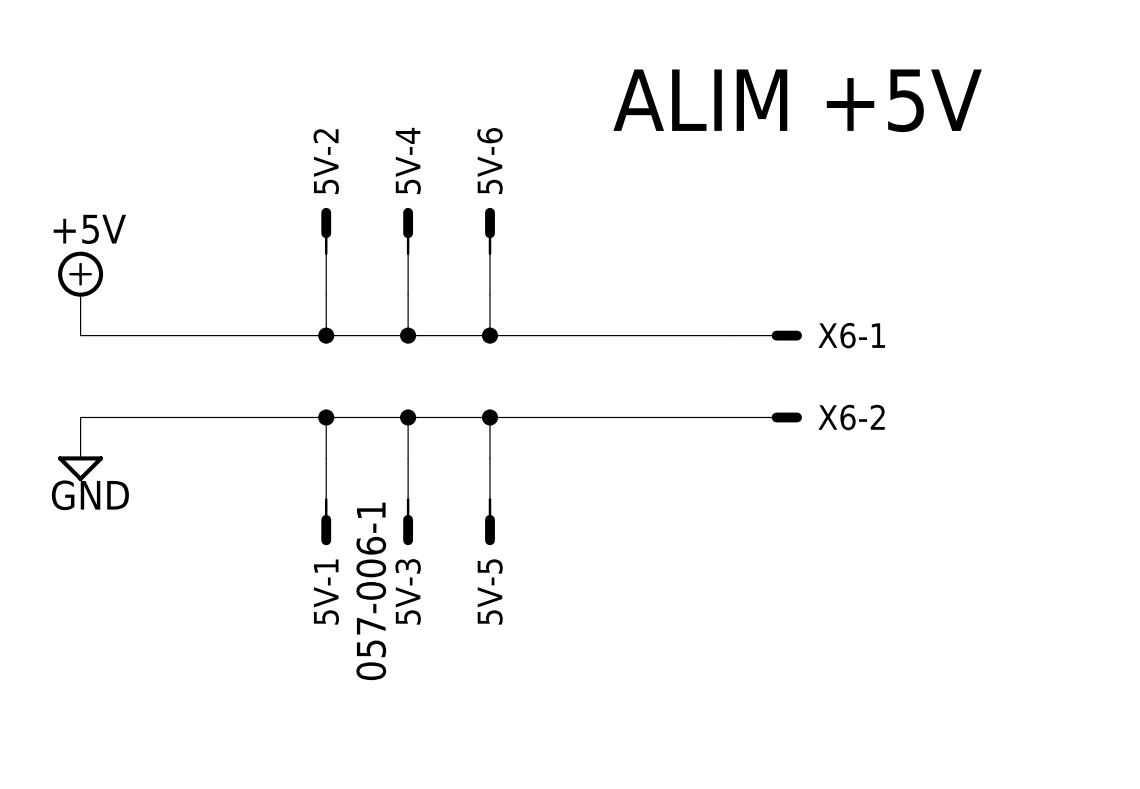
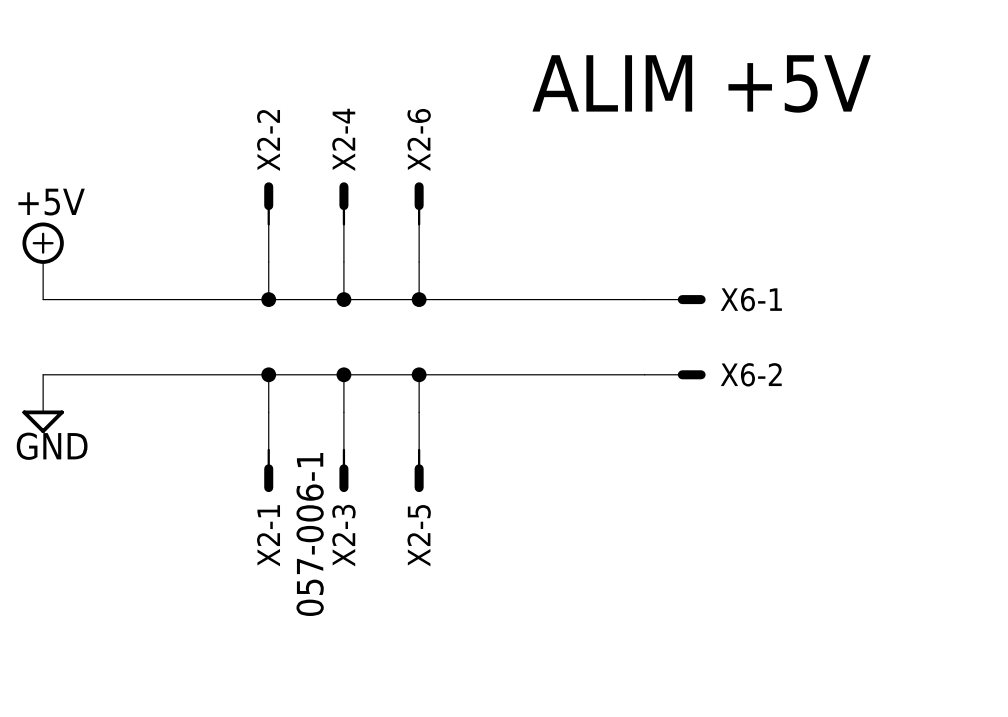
5V-4 name: 5V-4 (408, 160) -> X2-4 (343, 139)
5V-2 name: 5V-2 (326, 161) -> X2-2 (268, 140)
5V-6 name: 5V-6 (490, 161) -> X2-6 (419, 139)
5V-3 name: 5V-3 (408, 591) -> X2-3 (343, 535)
5V-5 name: 5V-5 (490, 591) -> X2-5 (419, 535)
5V-1 name: 5V-1 (326, 592) -> X2-1 (268, 535)

